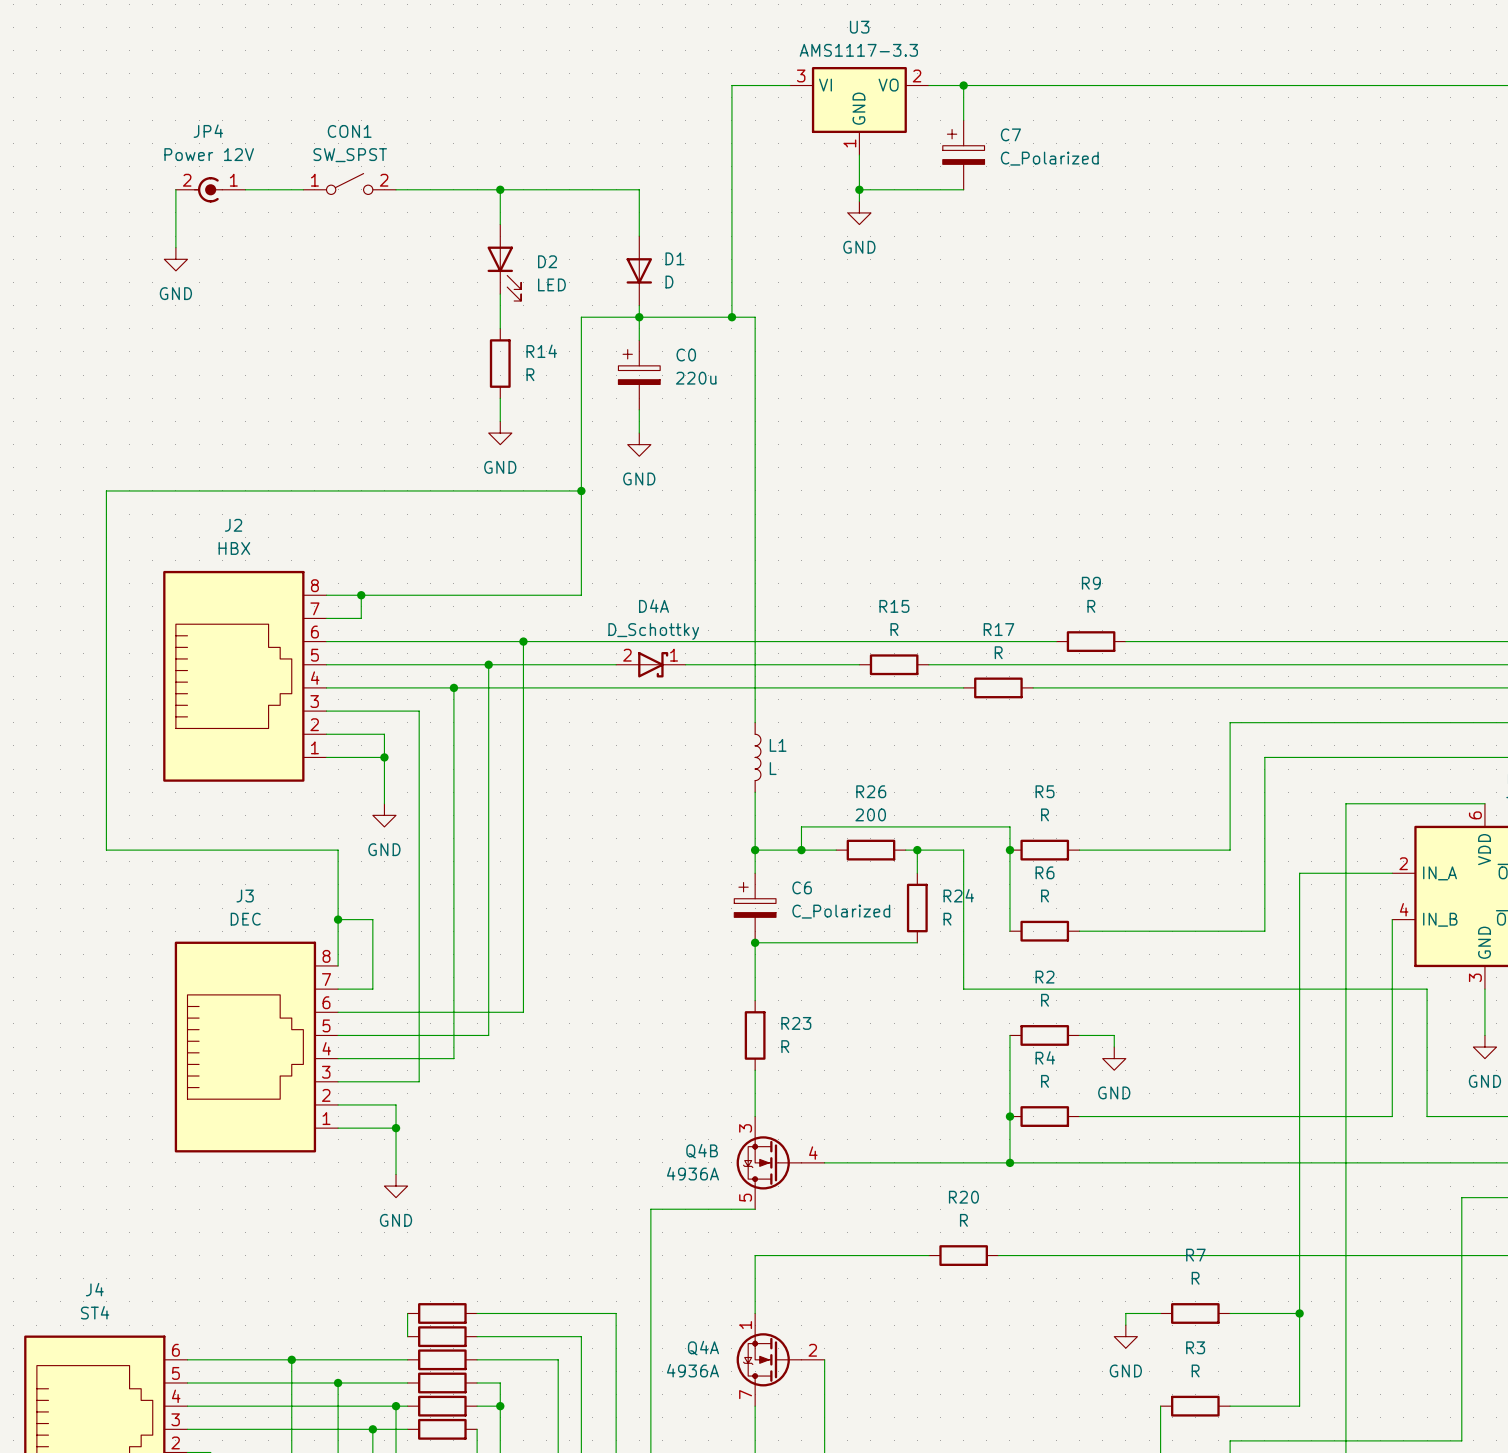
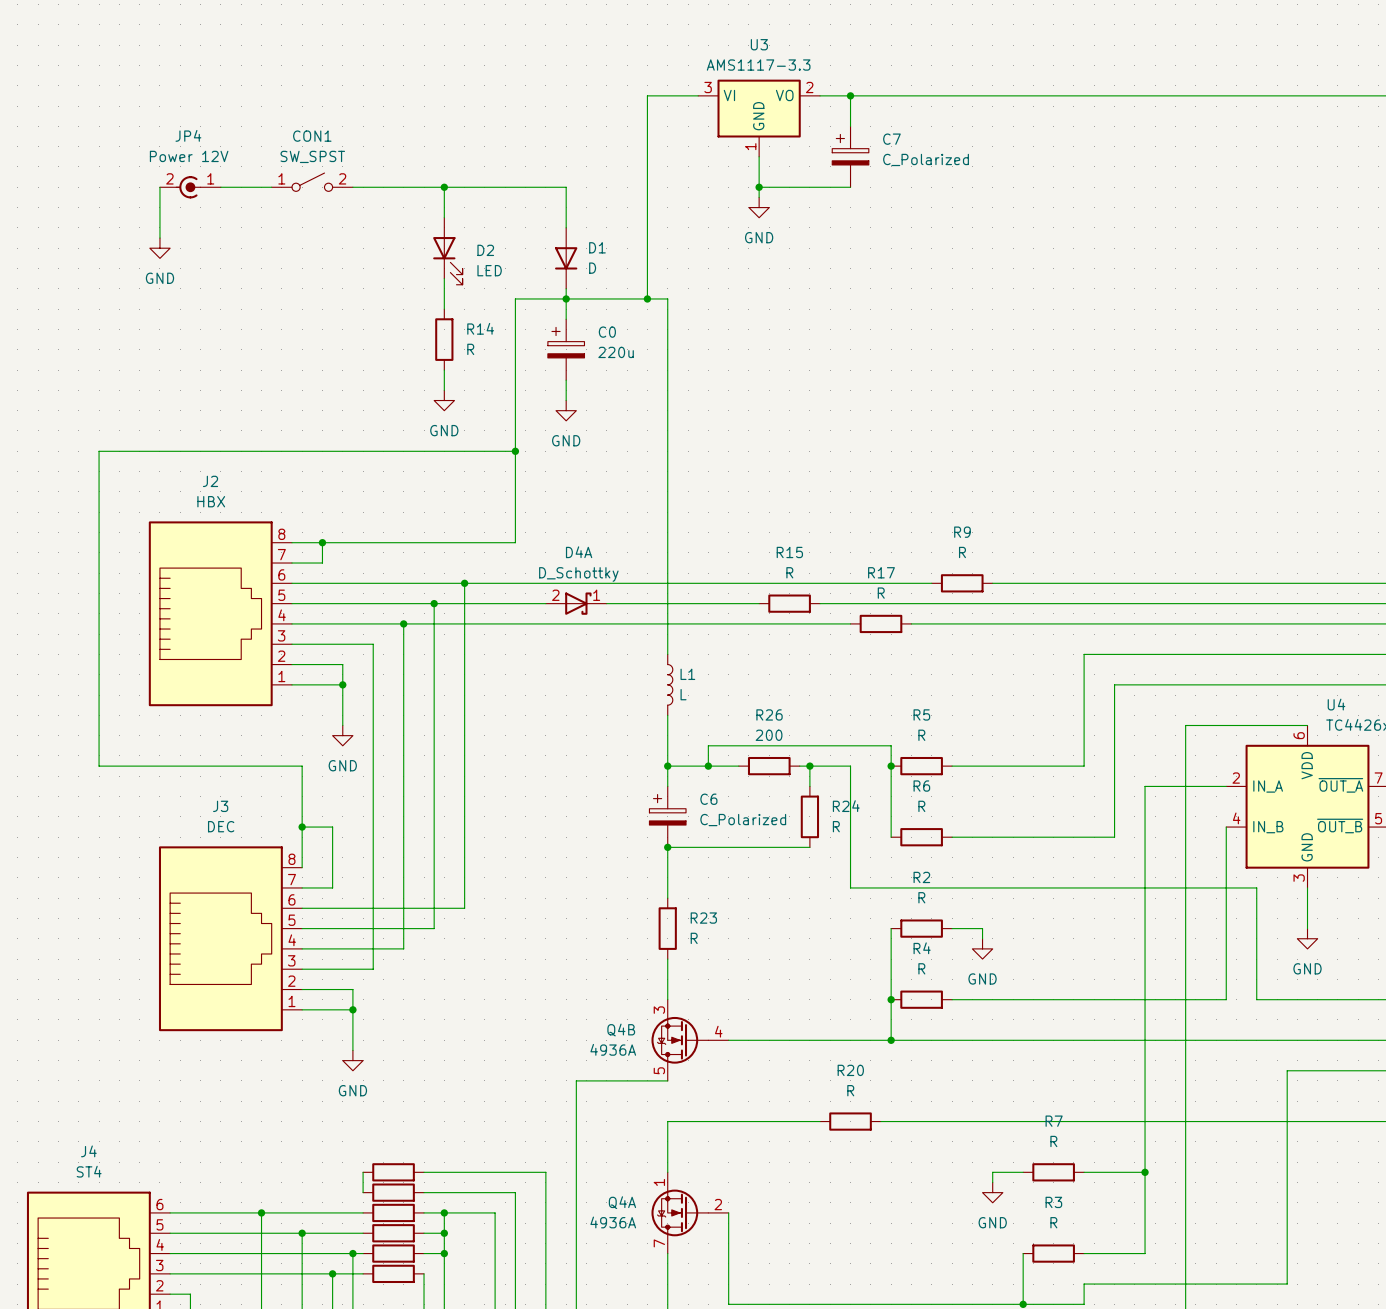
wire: none -> (444, 1212) (444, 1233)
junction: none -> (444, 1212)
junction: none -> (444, 1233)

